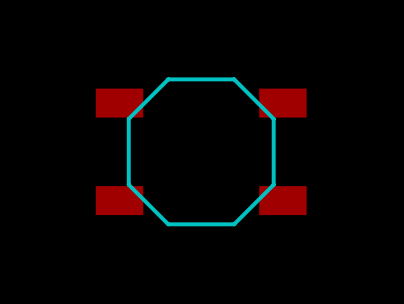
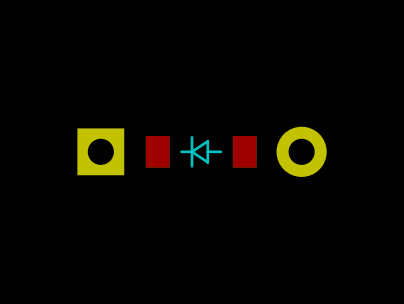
part footprint: [95, 77, 307, 227] -> [77, 126, 327, 177]

